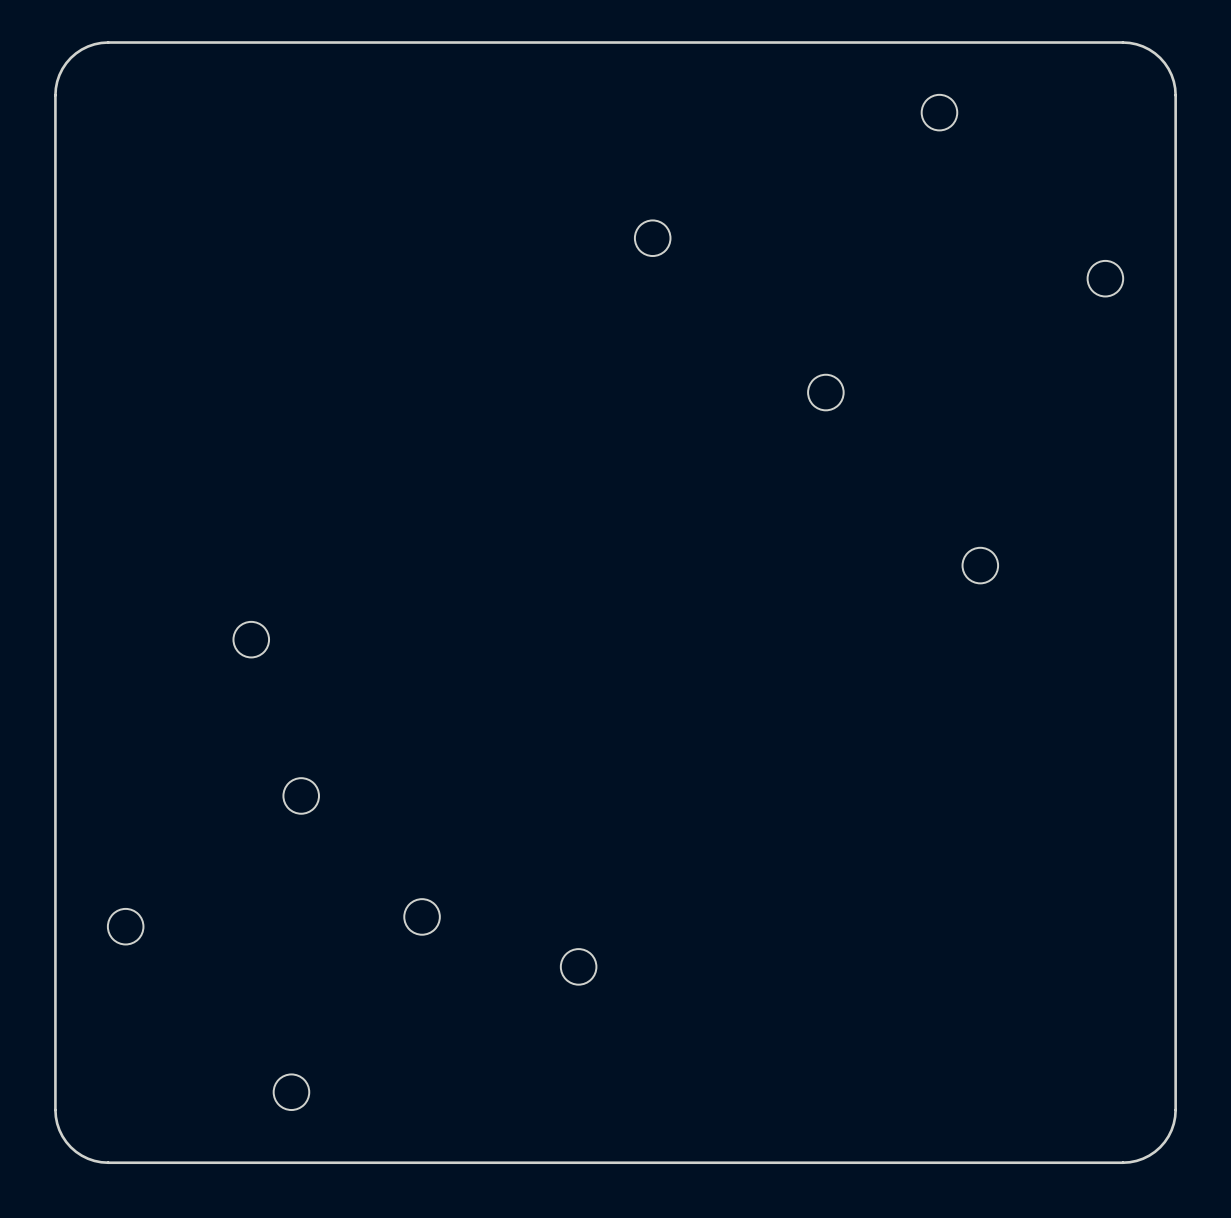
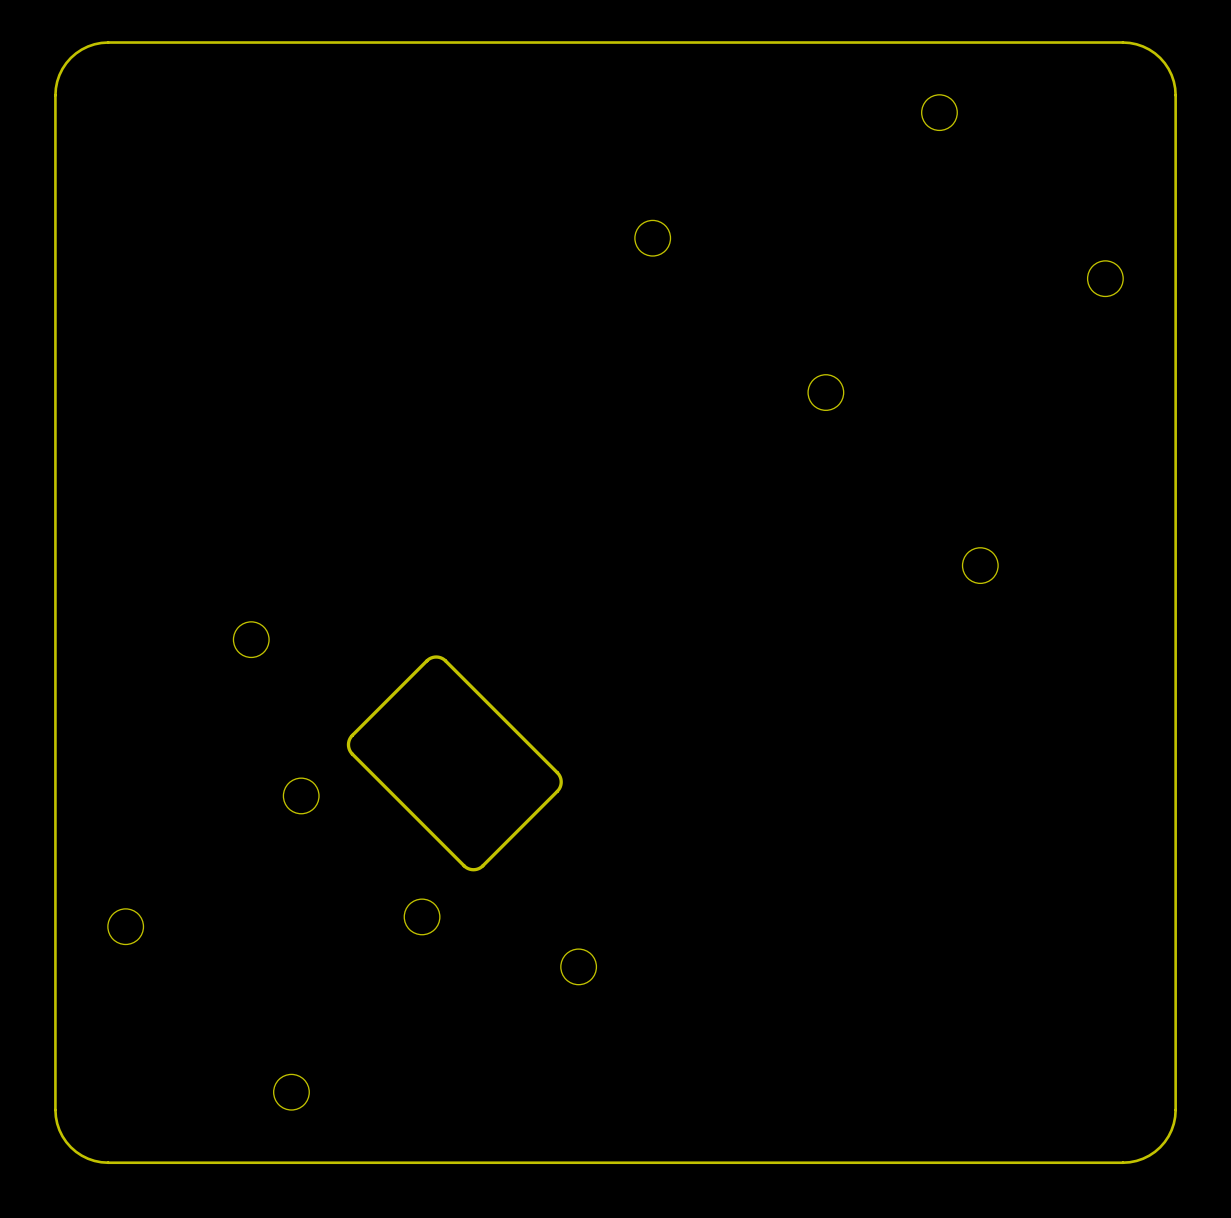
board edge: none -> (445, 660) (557, 772) (561, 780) (557, 791) (482, 865) (475, 869) (464, 865) (352, 754) (348, 746) (352, 735) (426, 660) (436, 657) (445, 660)

